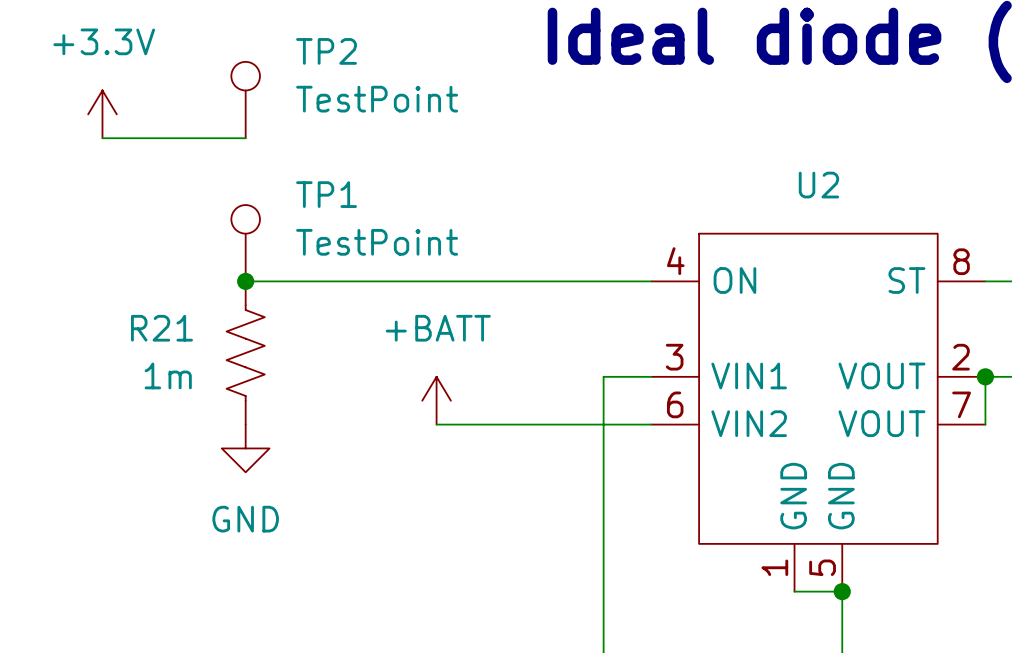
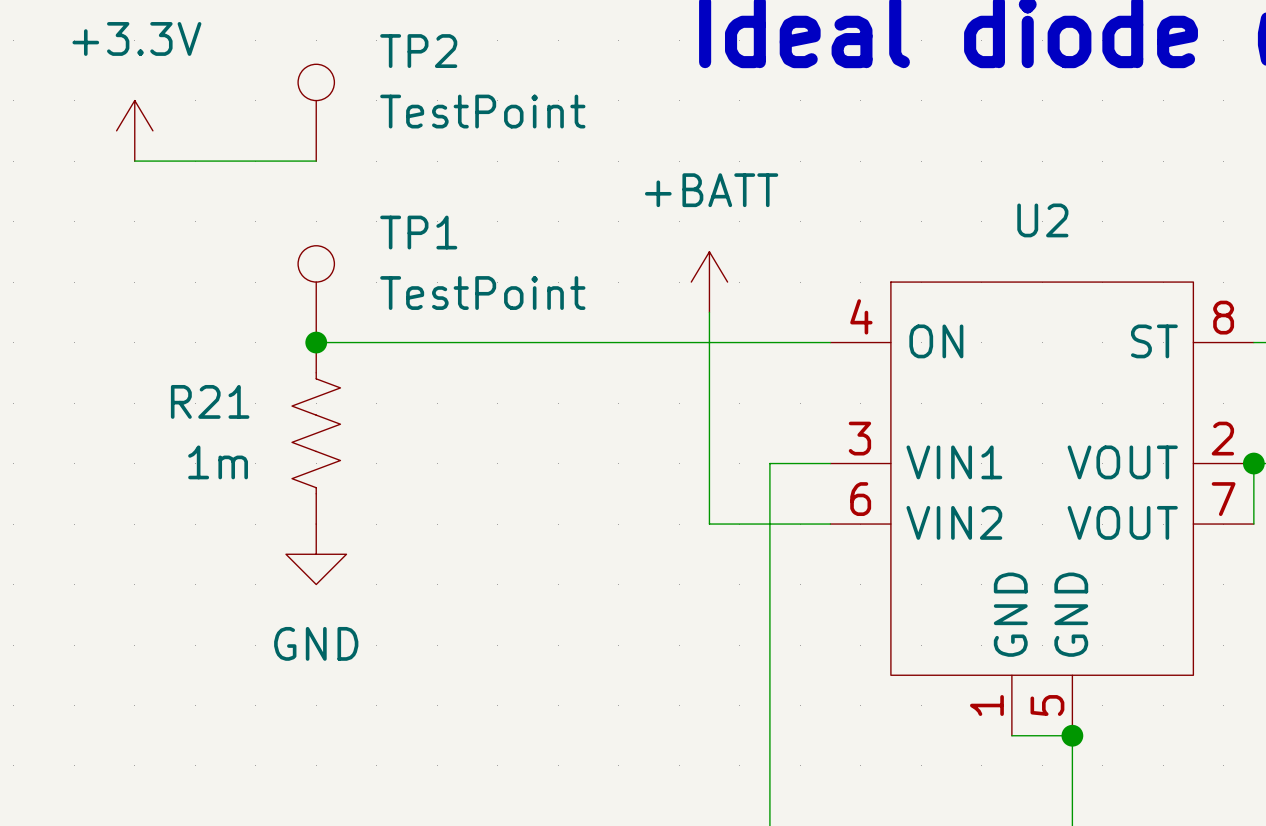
power symbol position: +BATT (436, 400) -> +BATT (709, 282)
wire: (436, 424) (555, 424) -> (709, 312) (709, 524)

